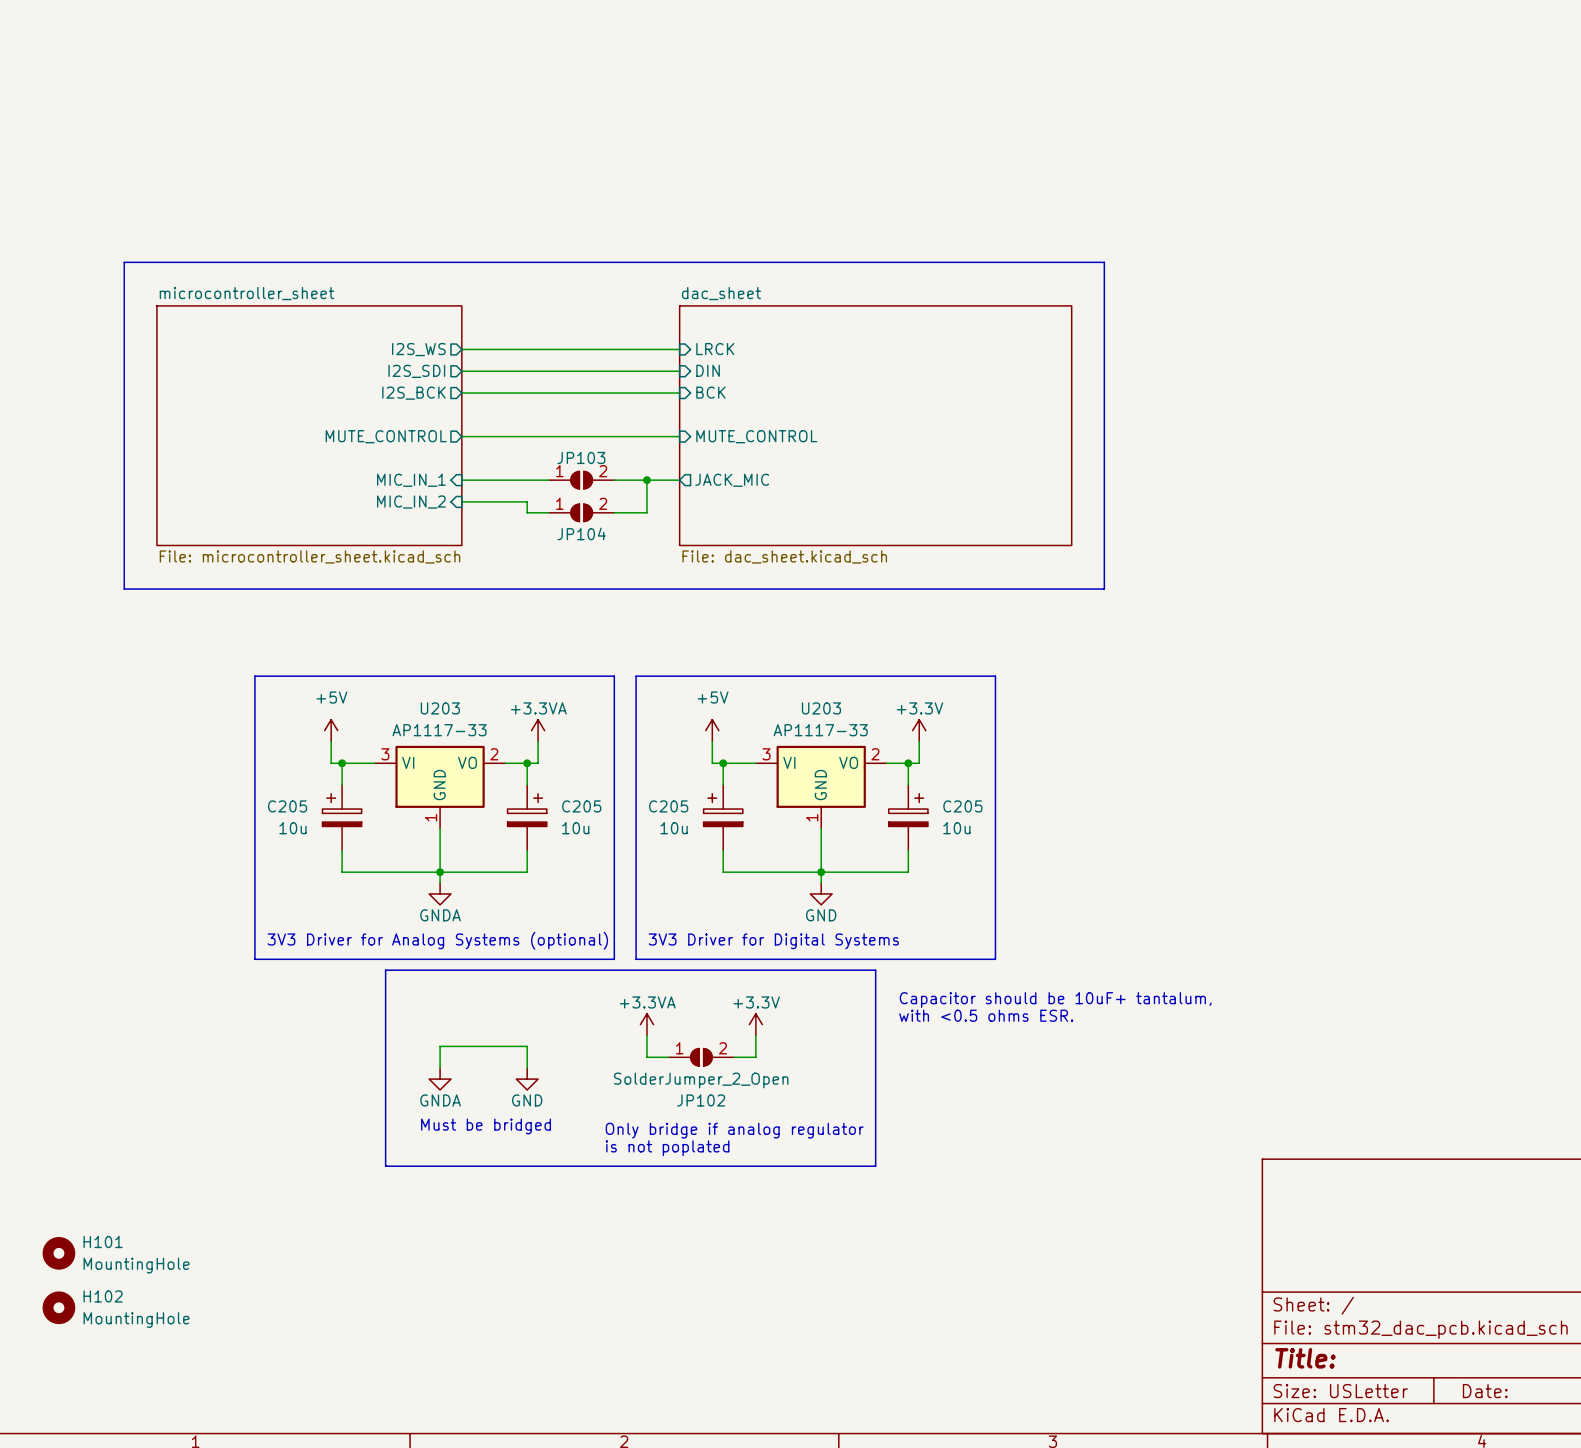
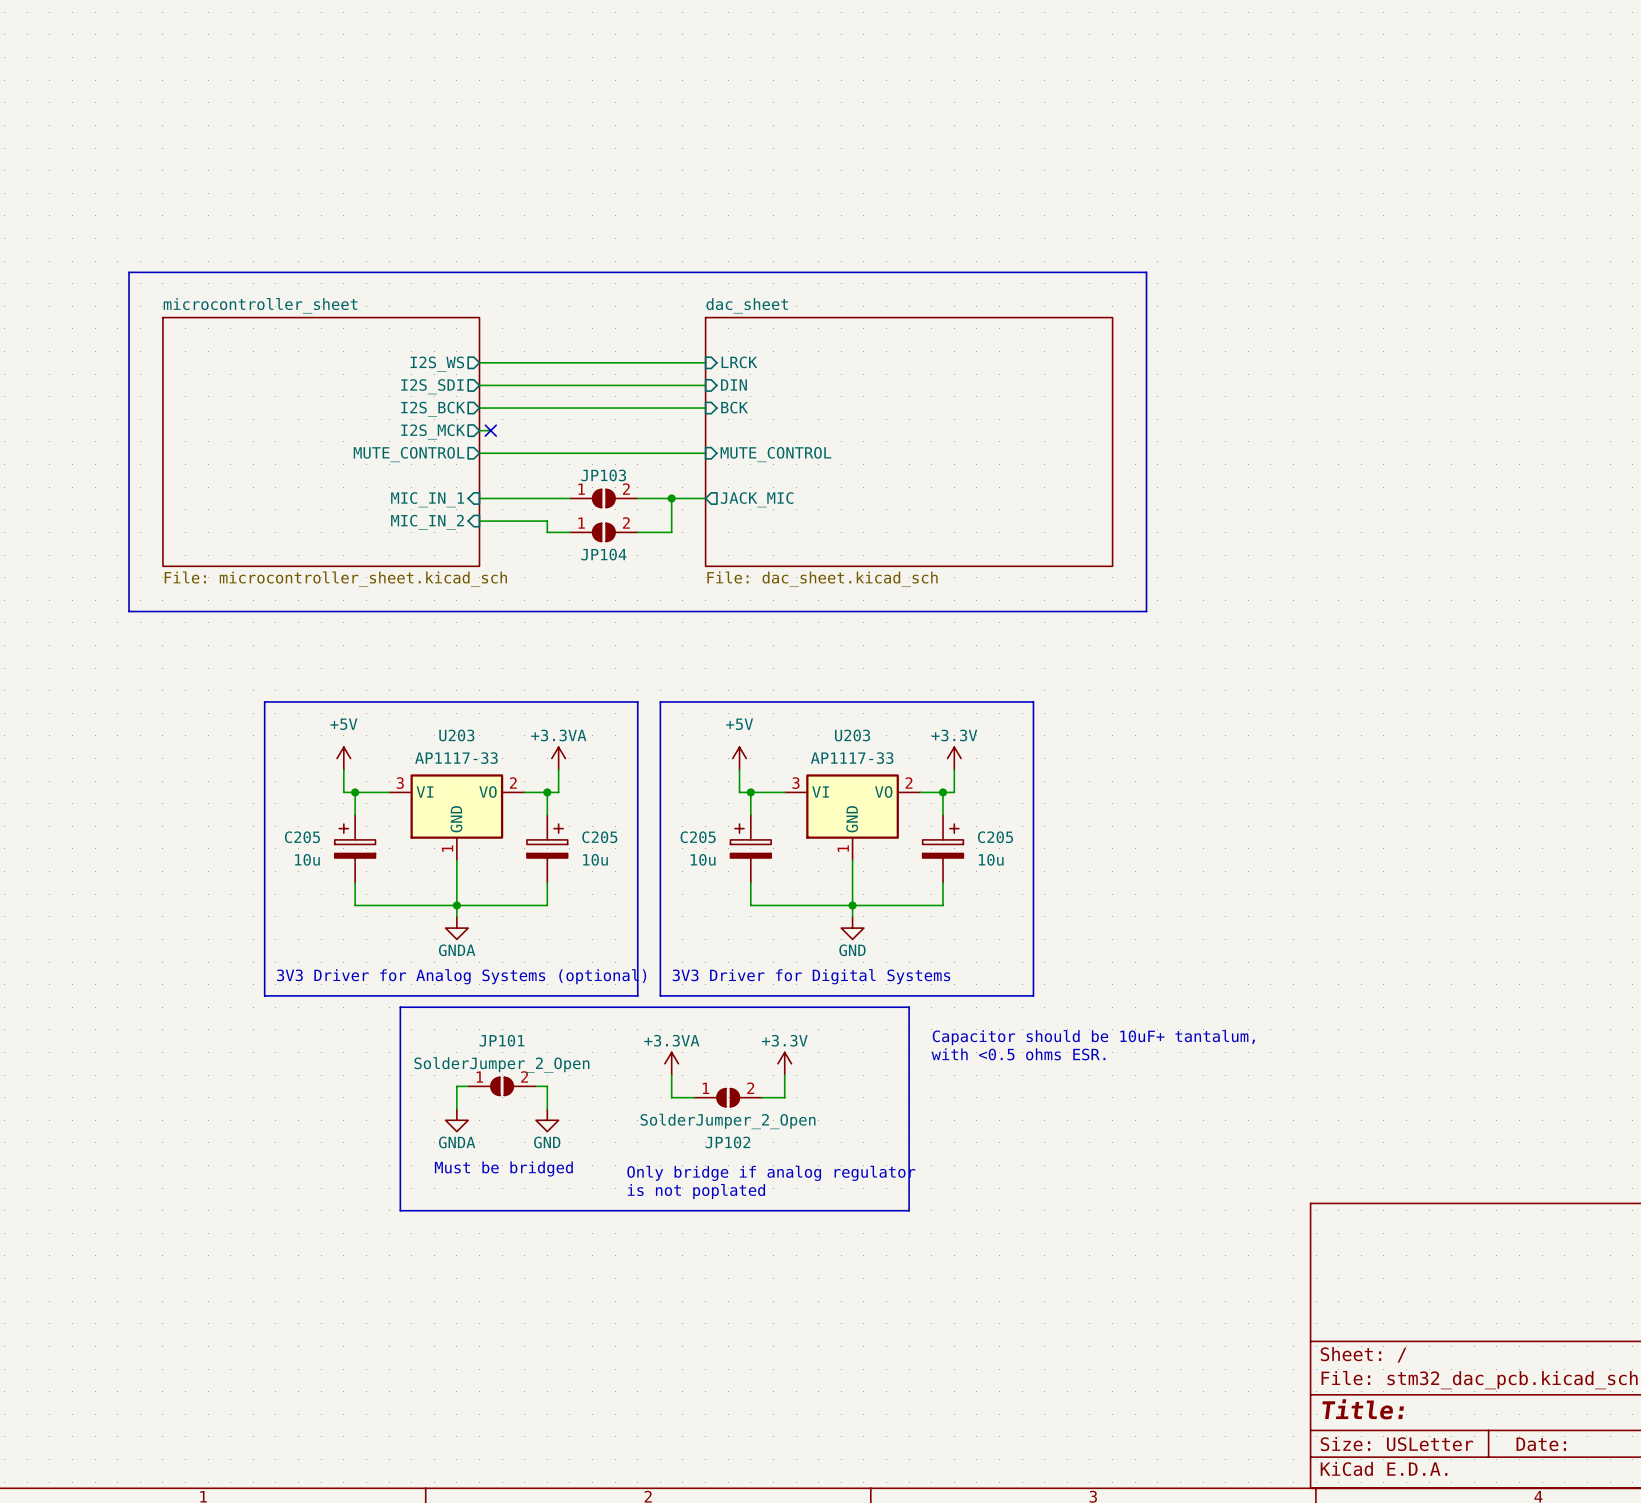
sheet pin: none -> I2S_MCK (433, 431)
wire: none -> (479, 430) (490, 430)
no-connect mark: none -> (490, 430)
JP101: none -> SolderJumper_2_Open (502, 1086)
H101: MountingHole (58, 1253) -> none
H102: MountingHole (58, 1307) -> none

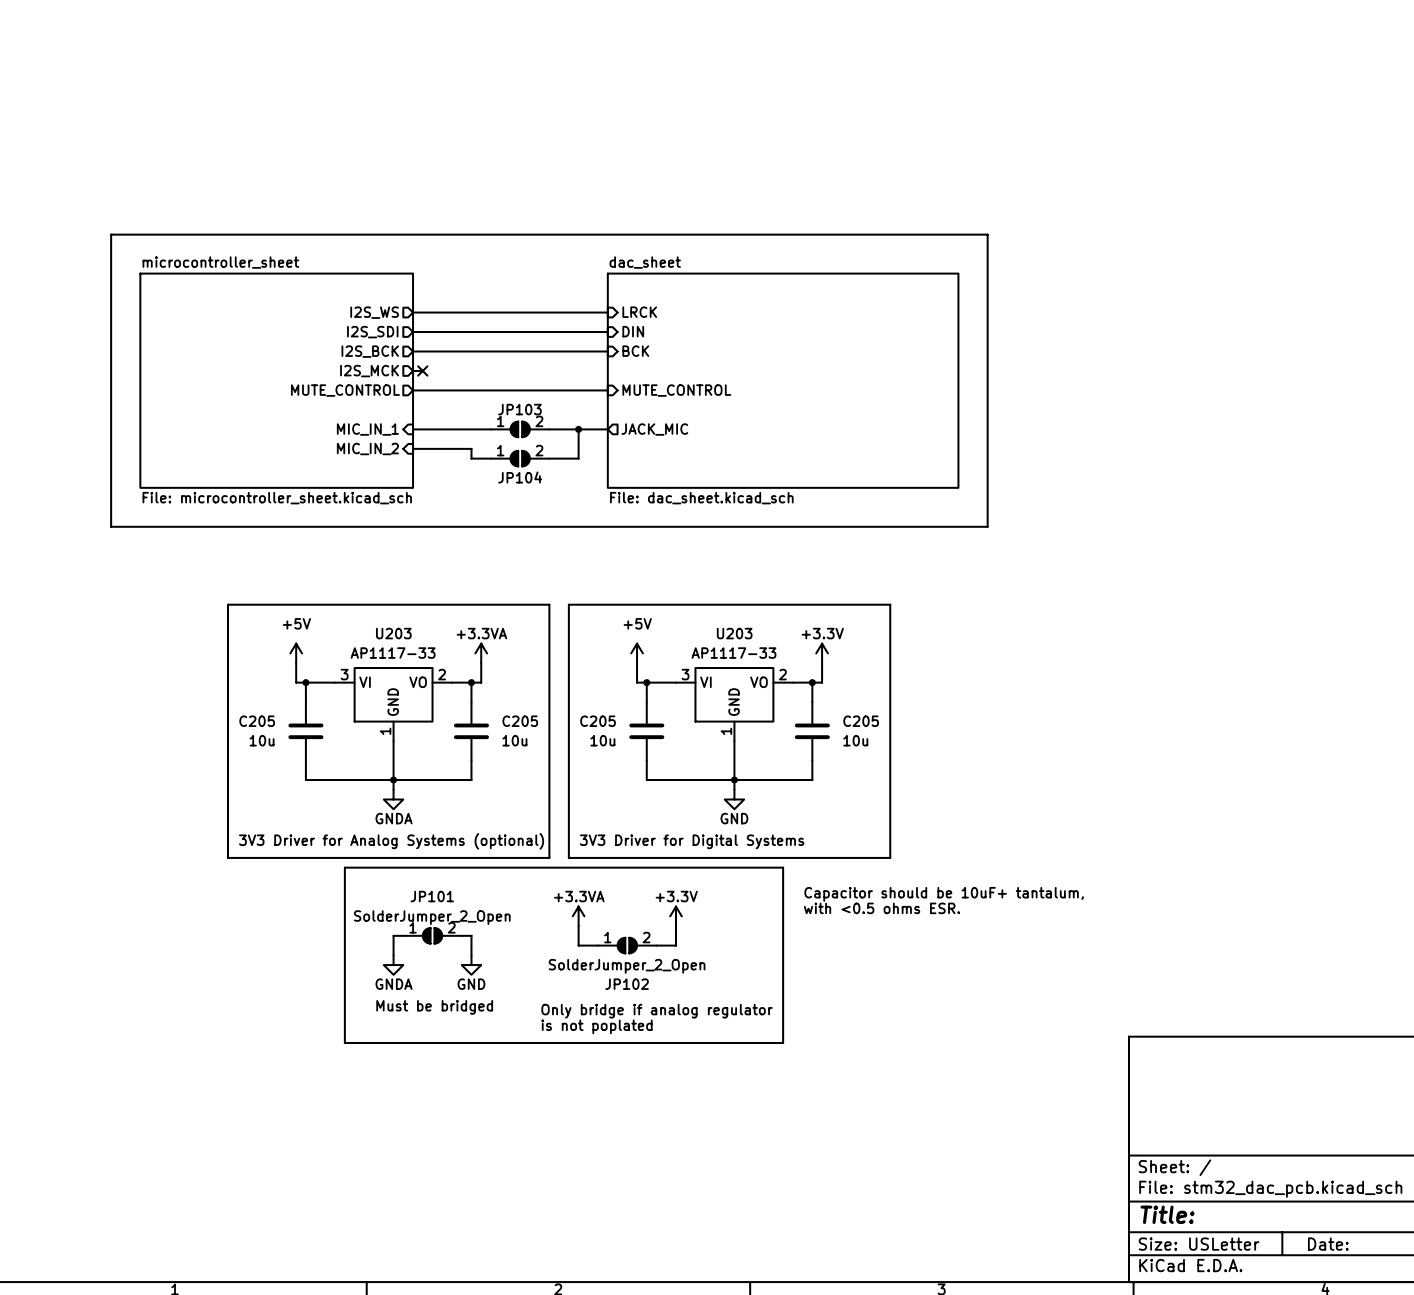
C205 symbol: [334, 815, 376, 883] -> [288, 702, 324, 761]
C205 symbol: [526, 815, 568, 883] -> [453, 702, 490, 761]
C205 symbol: [730, 815, 772, 883] -> [629, 702, 665, 761]
C205 symbol: [922, 815, 964, 883] -> [794, 702, 830, 761]

